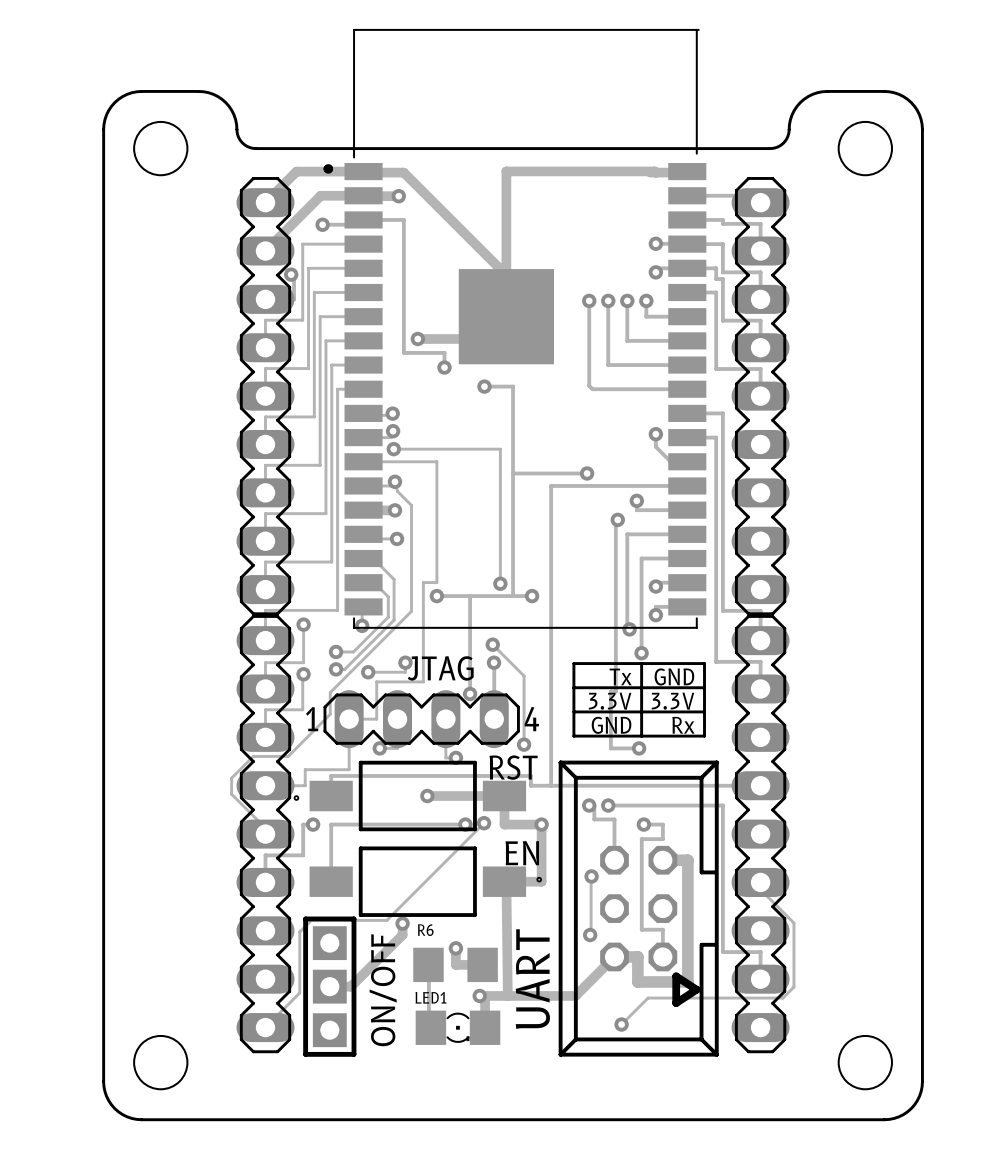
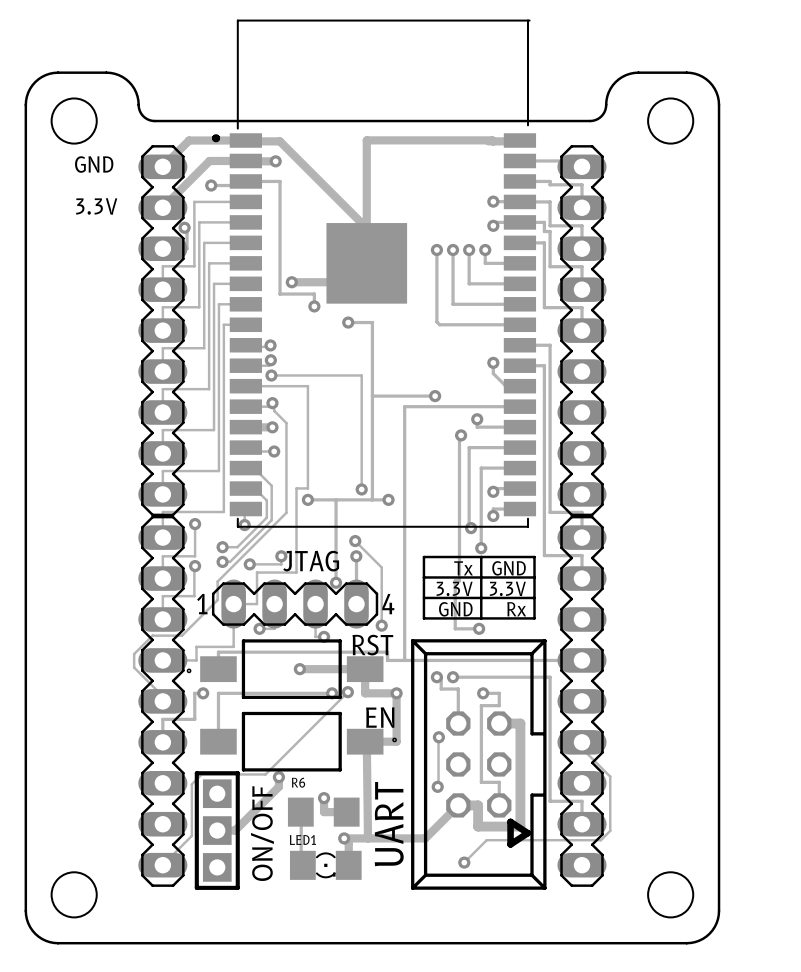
text: none -> GND (94, 164)
text: none -> 3.3V (96, 206)

